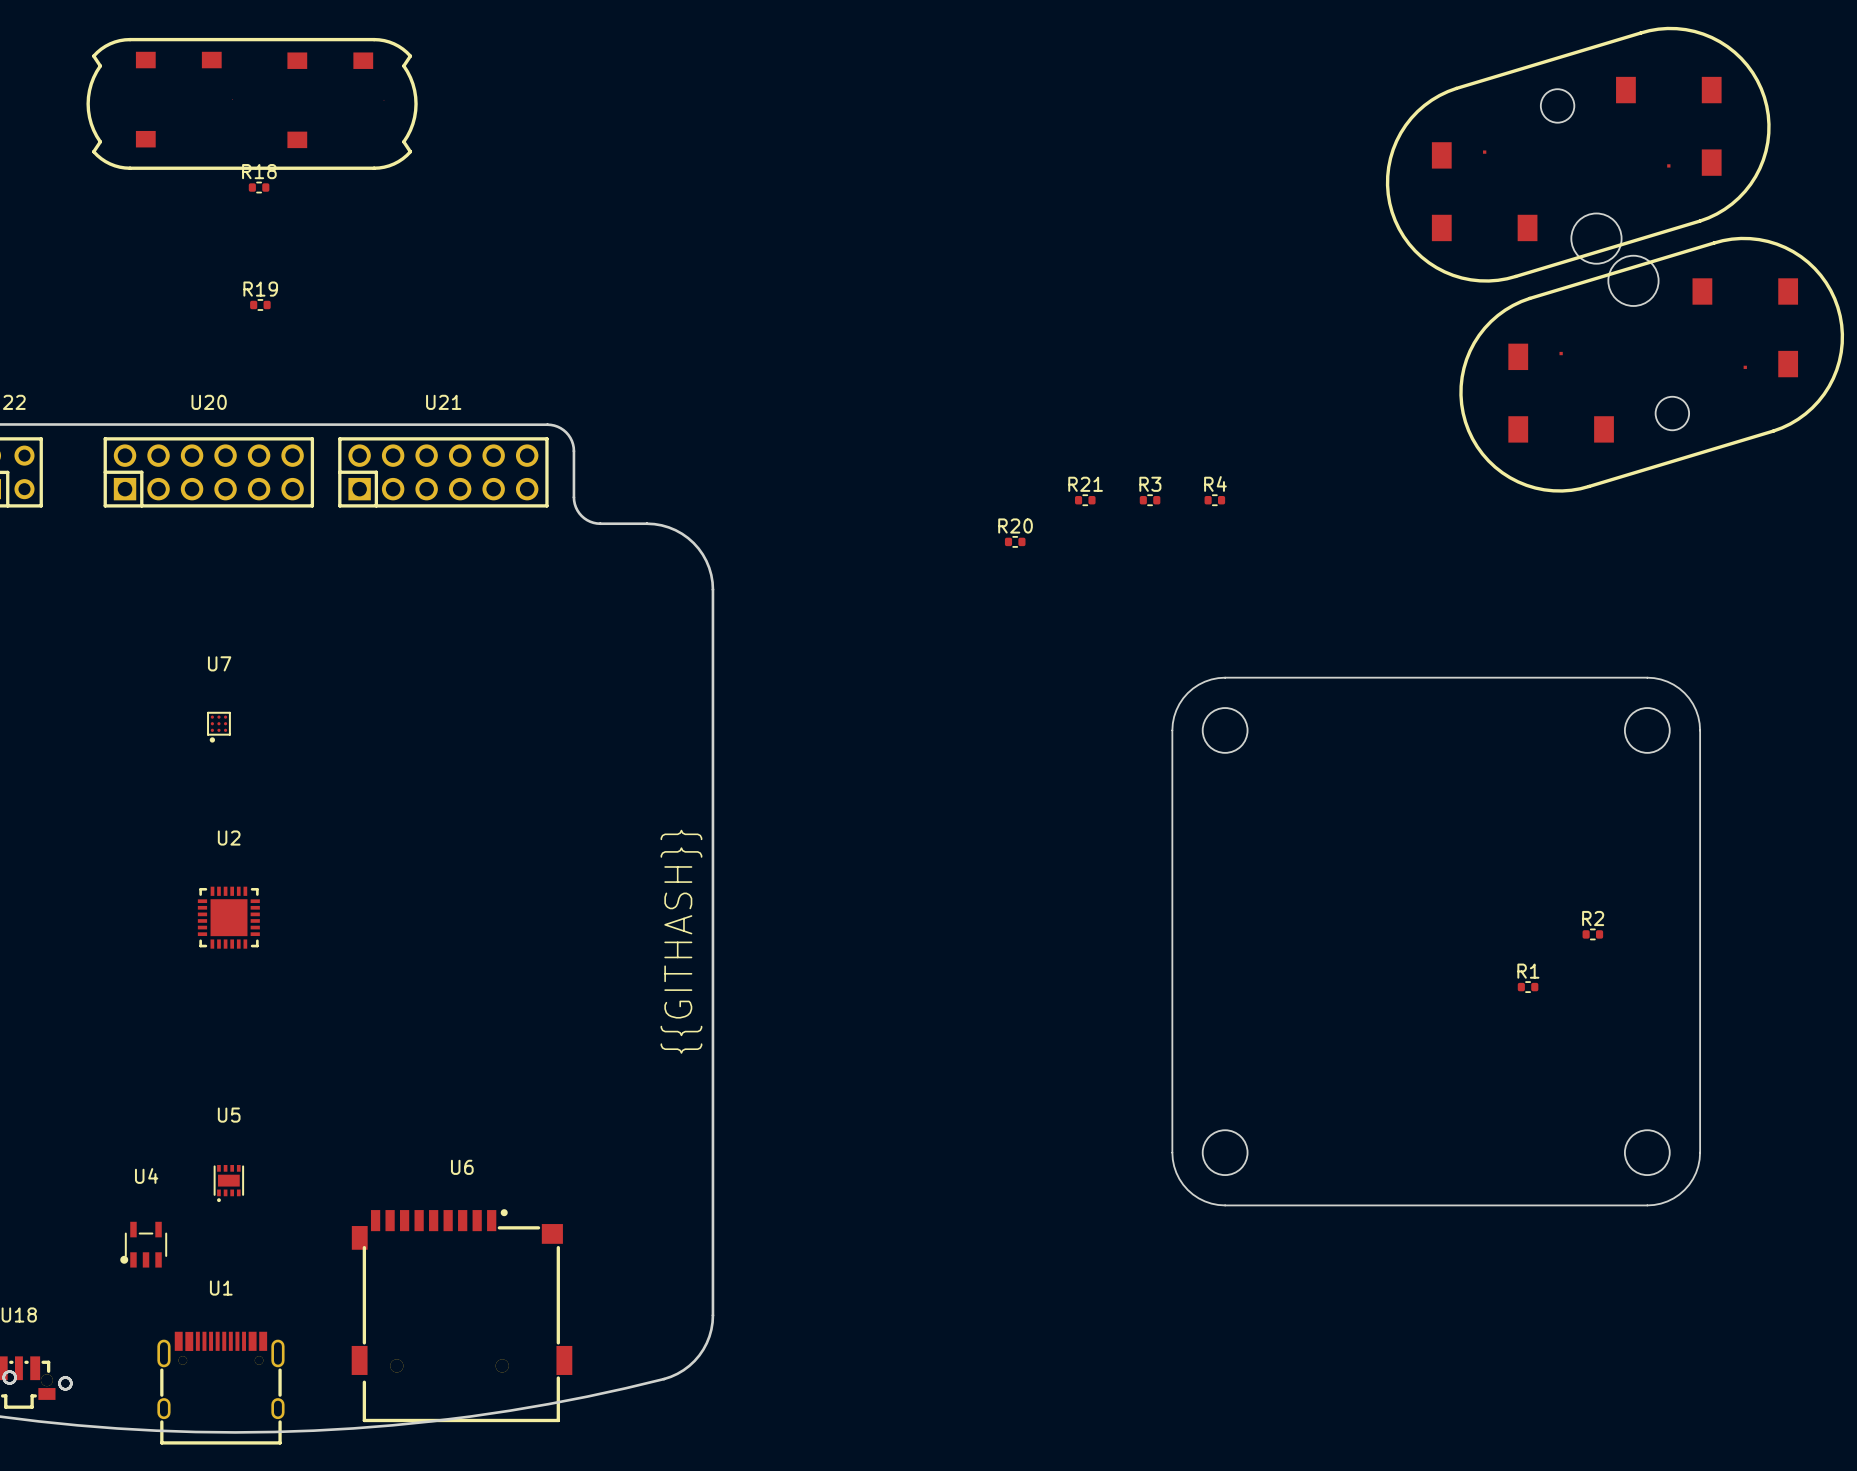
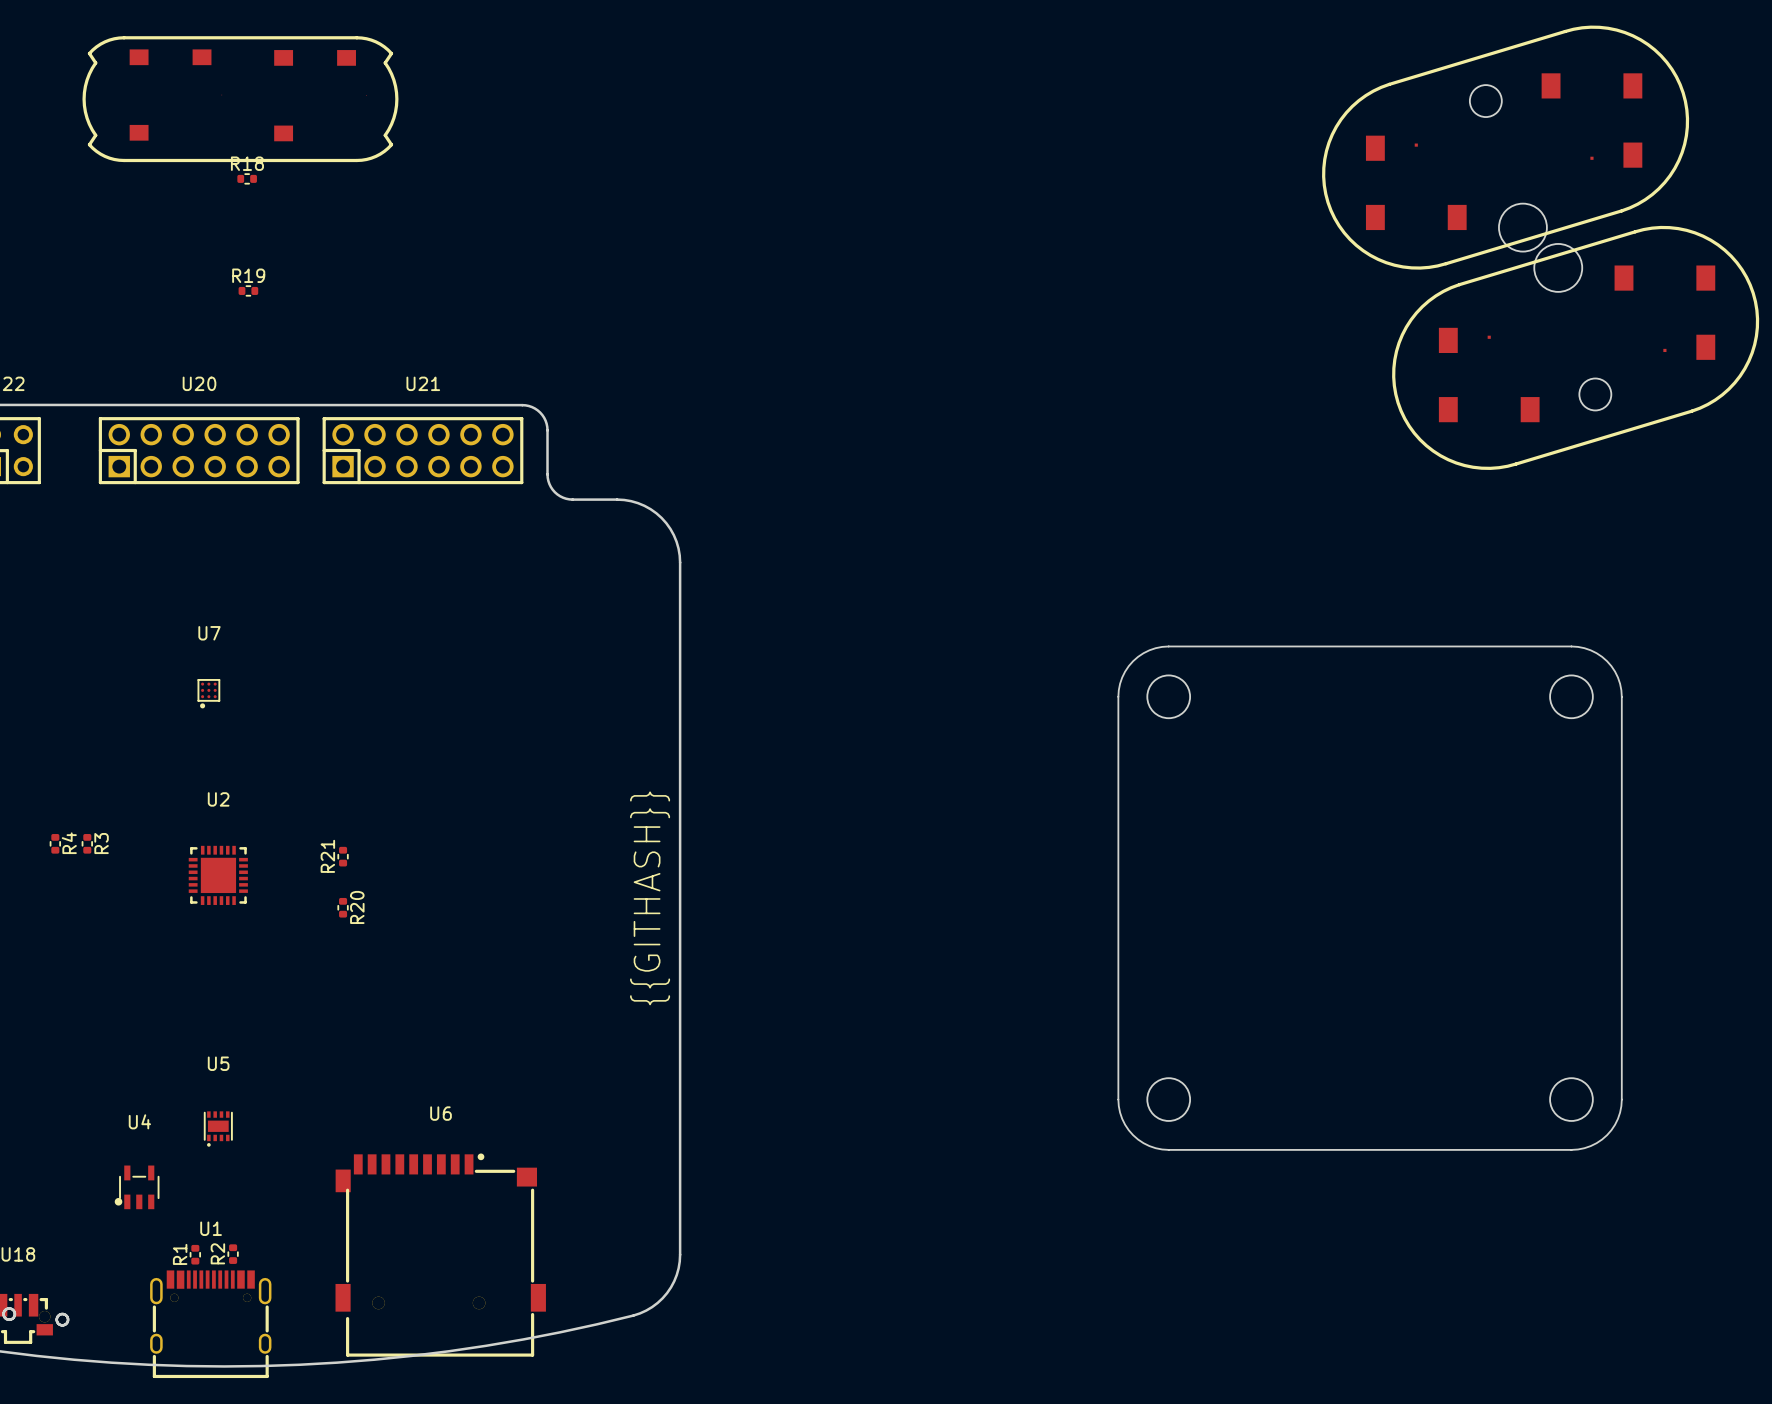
R21 rotation: 0° (1085, 500) -> 90° clockwise (343, 856)
R21 position: (1085, 500) -> (343, 856)
R3 rotation: 0° (1150, 500) -> 90° clockwise (87, 843)
R3 position: (1150, 500) -> (87, 843)
R4 rotation: 0° (1214, 500) -> 90° clockwise (55, 843)
R4 position: (1214, 500) -> (55, 843)
R20 rotation: 0° (1015, 541) -> 90° clockwise (343, 907)
R20 position: (1015, 541) -> (343, 907)
R2 rotation: 0° (1592, 934) -> 90° clockwise (233, 1254)
R2 position: (1592, 934) -> (233, 1254)
R1 rotation: 0° (1528, 987) -> 90° clockwise (195, 1254)
R1 position: (1528, 987) -> (195, 1254)

